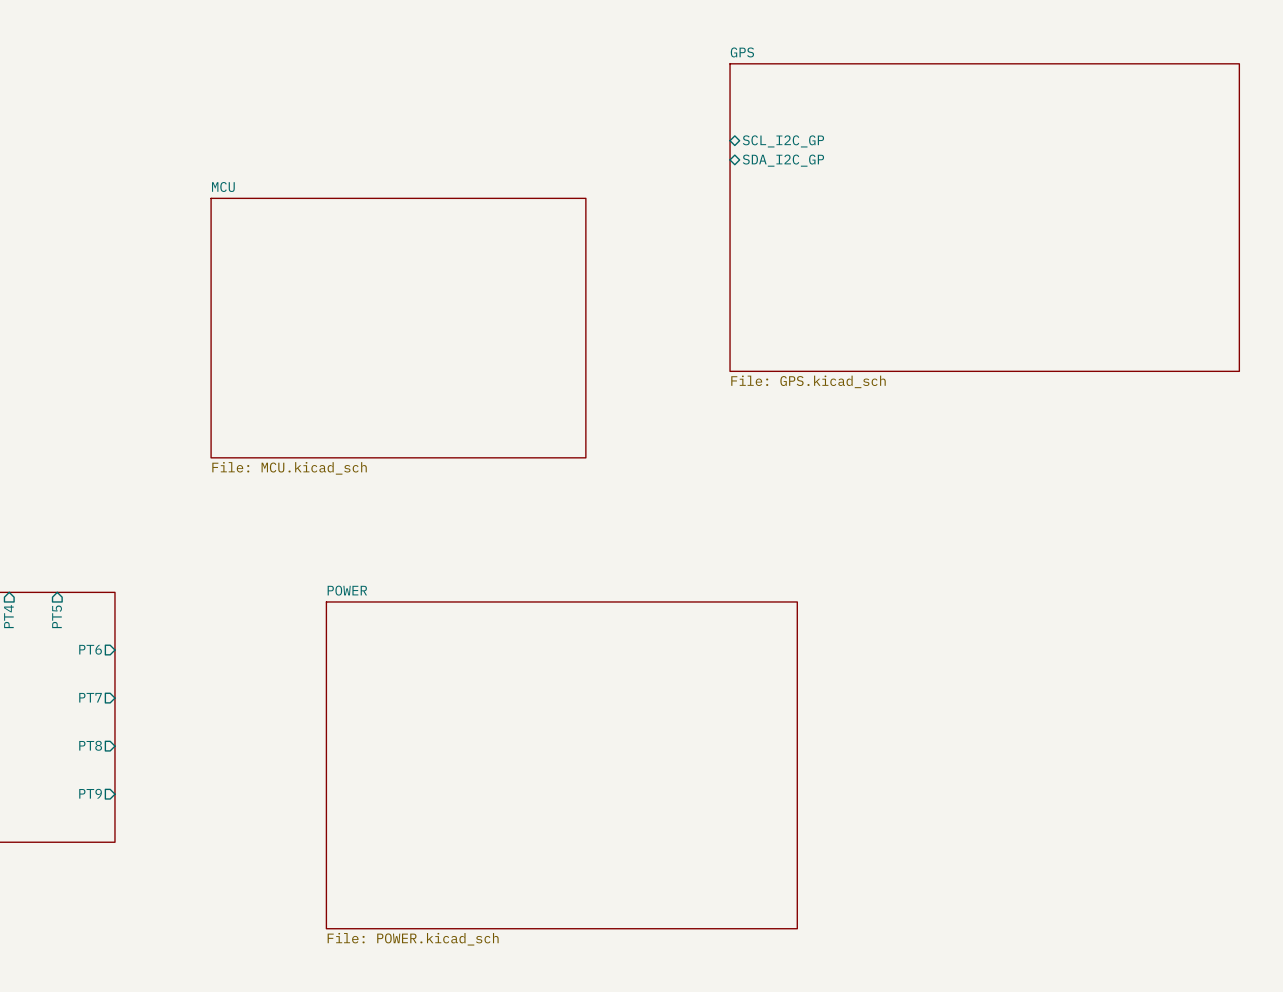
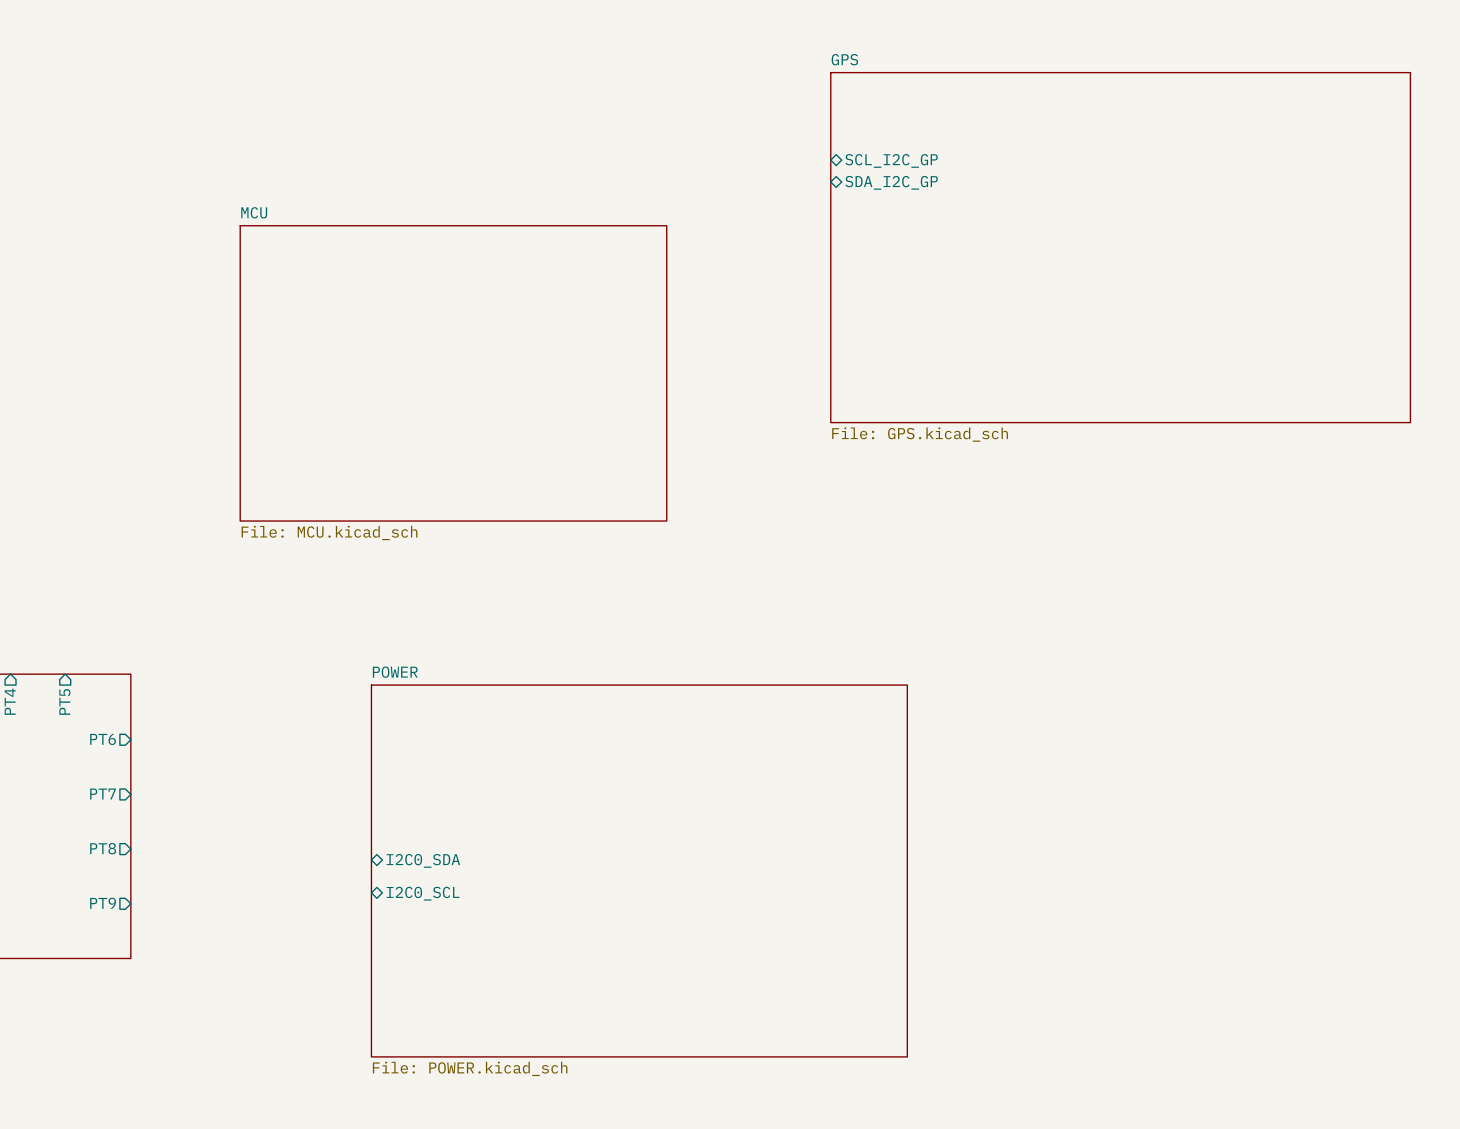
sheet pin: none -> I2C0_SDA (423, 860)
sheet pin: none -> I2C0_SCL (423, 893)

